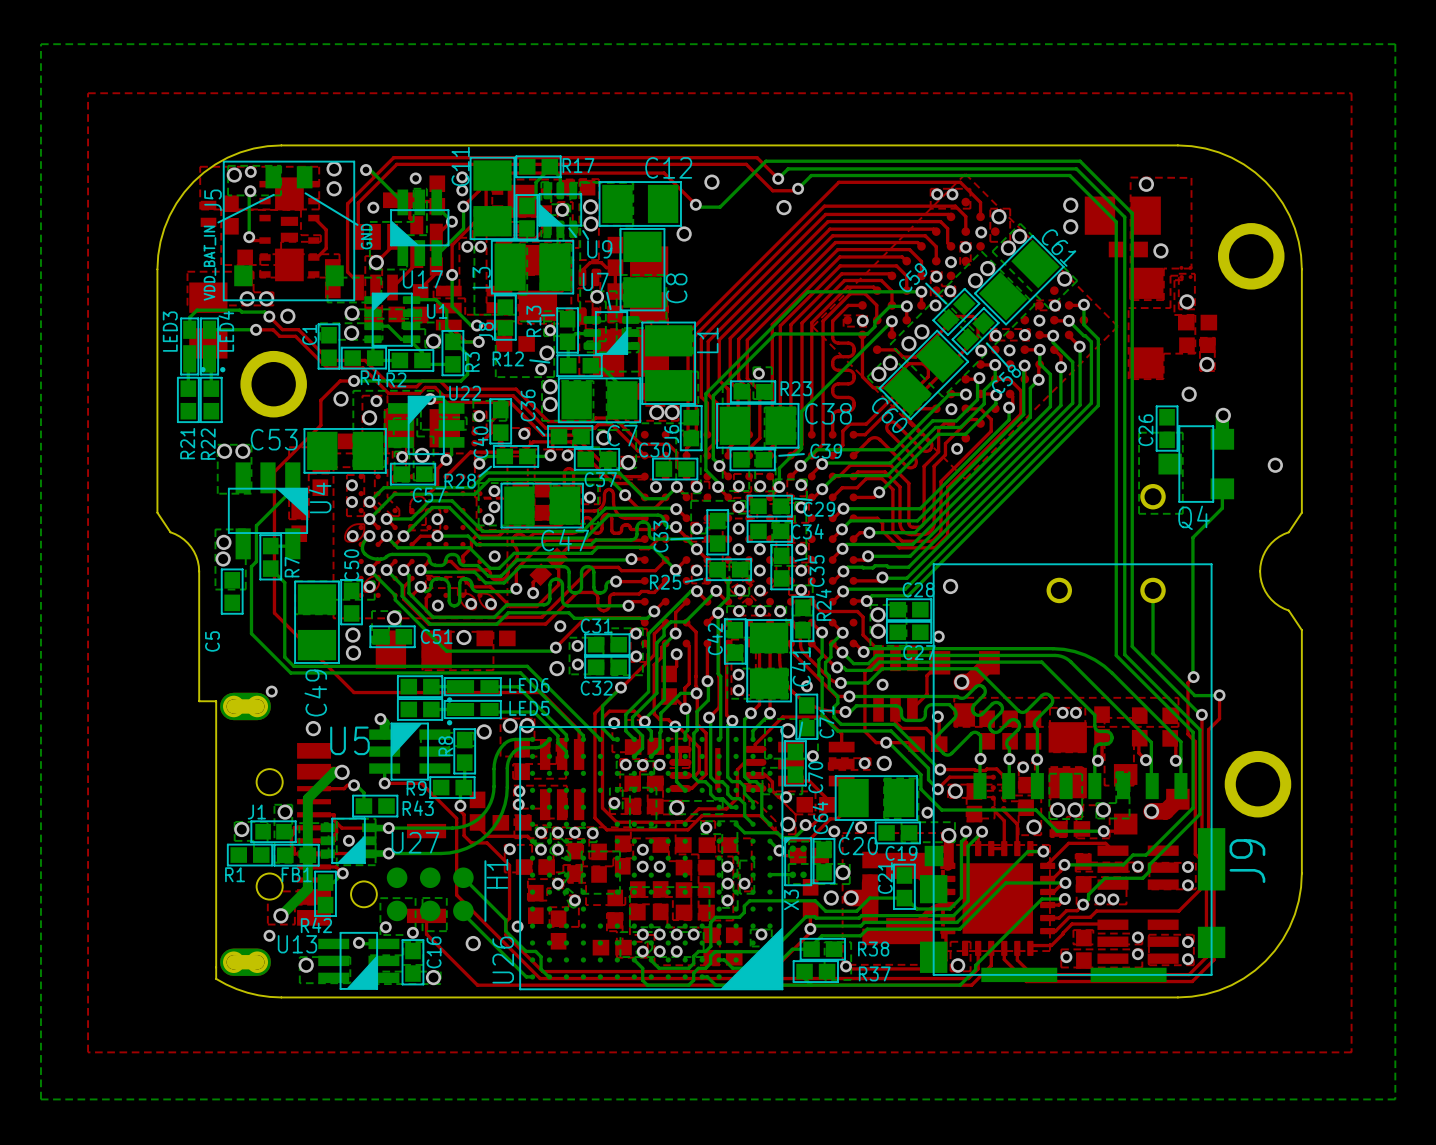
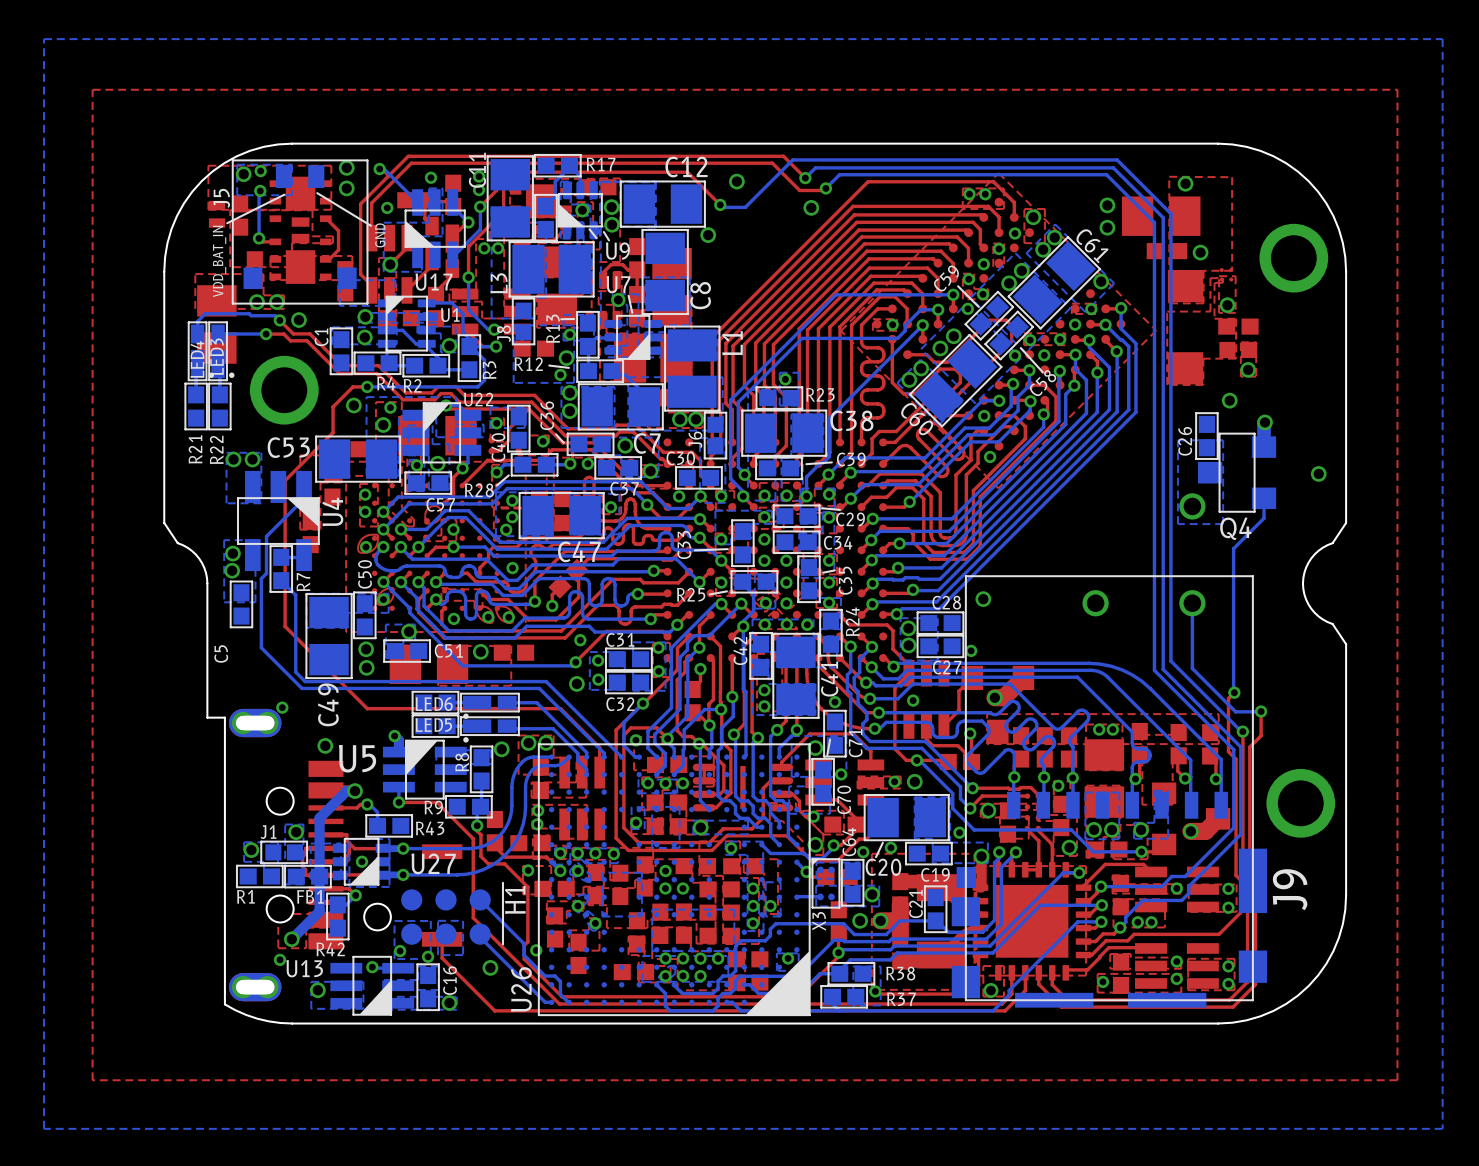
LED3 name position: LED3 (170, 331) -> LED3 (216, 356)
LED4 name position: LED4 (226, 331) -> LED4 (197, 359)
LED6 name position: LED6 (529, 685) -> LED6 (434, 704)
LED5 name position: LED5 (529, 708) -> LED5 (433, 724)

